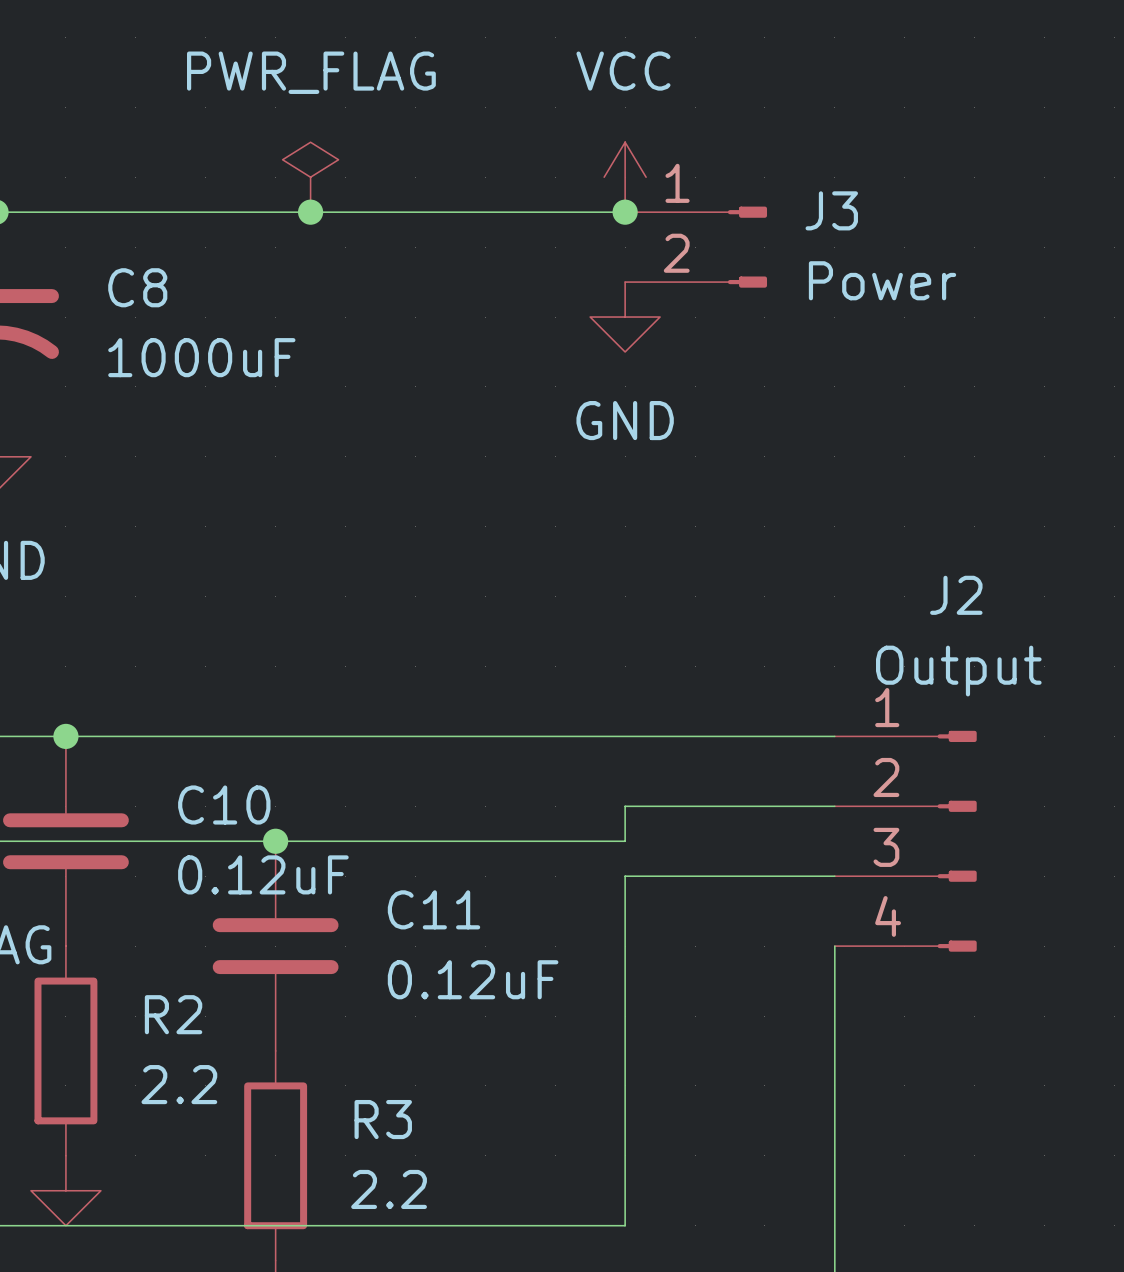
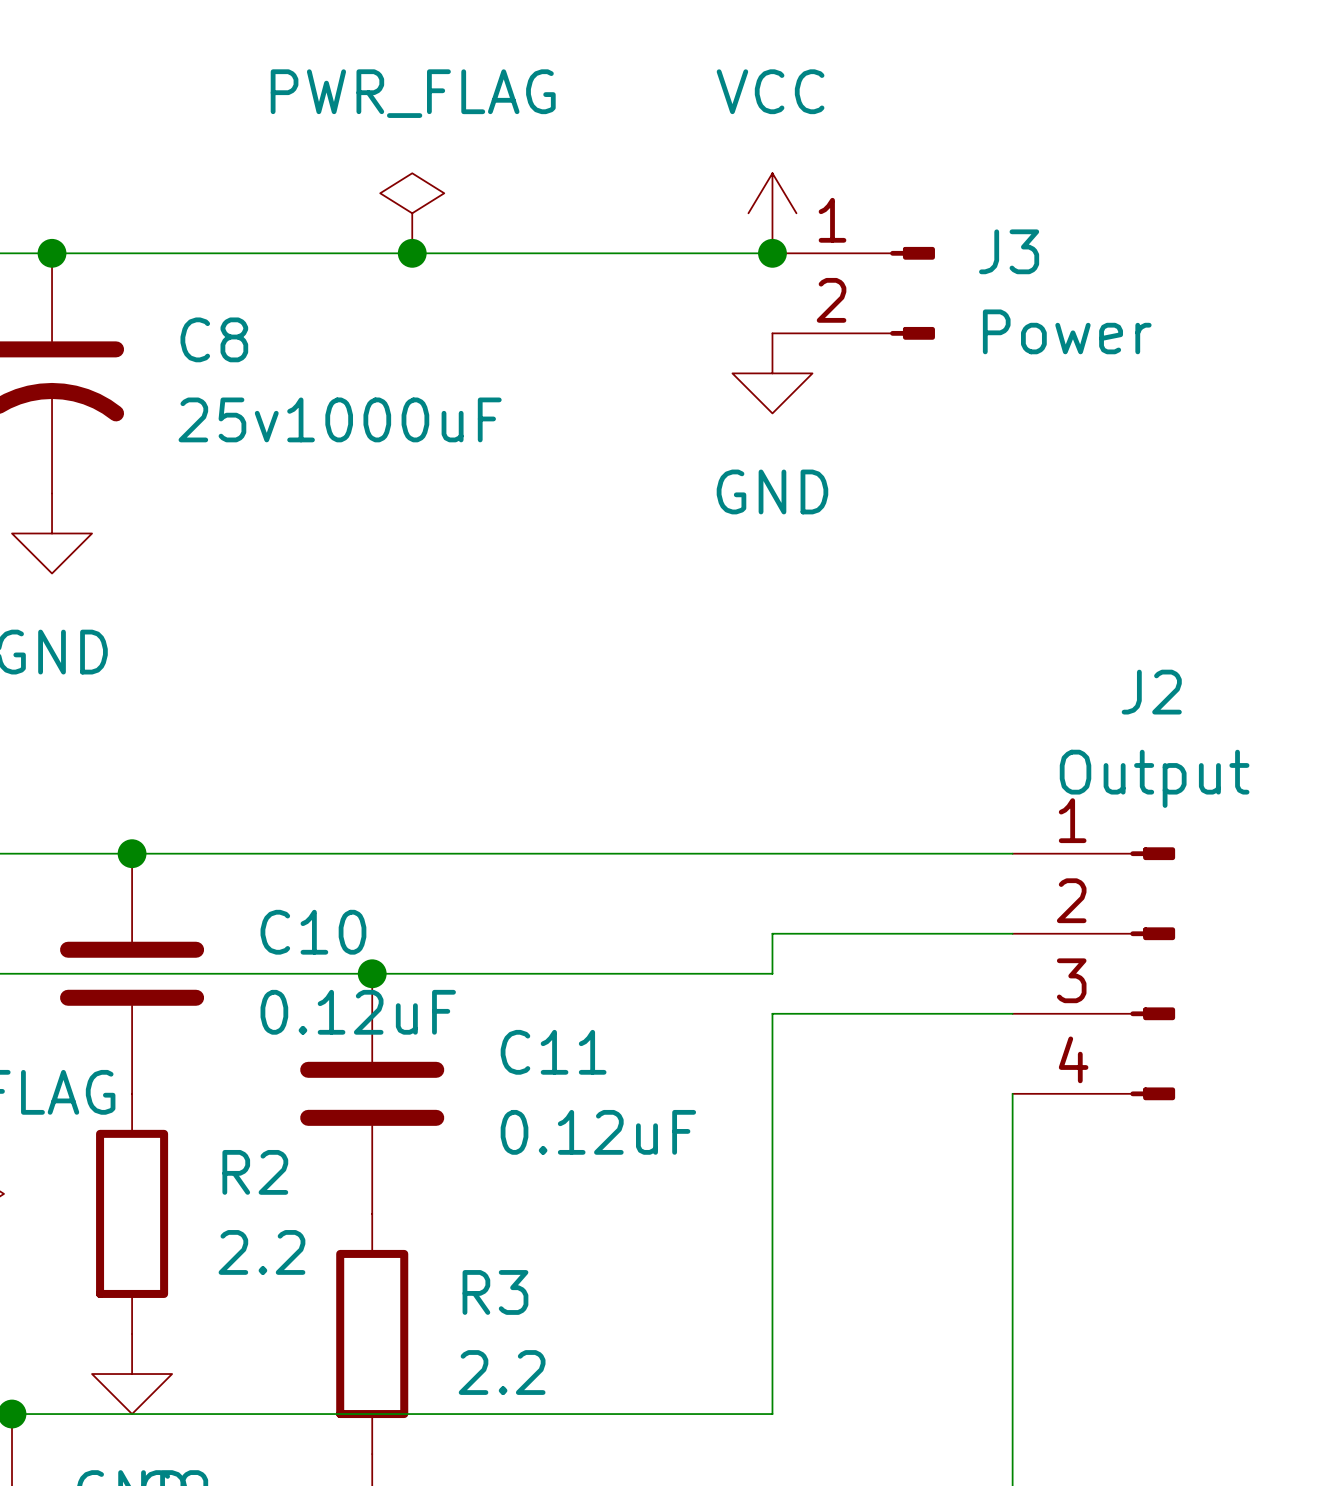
C8 value: 1000uF (201, 357) -> 25v1000uF (340, 419)

